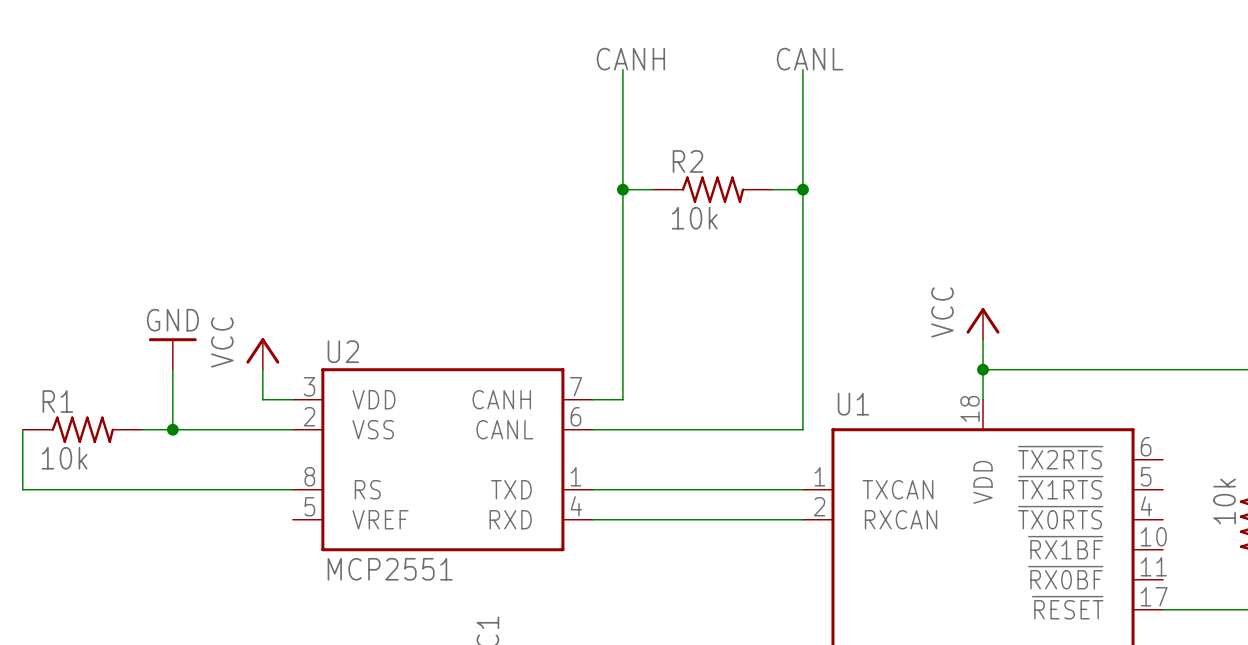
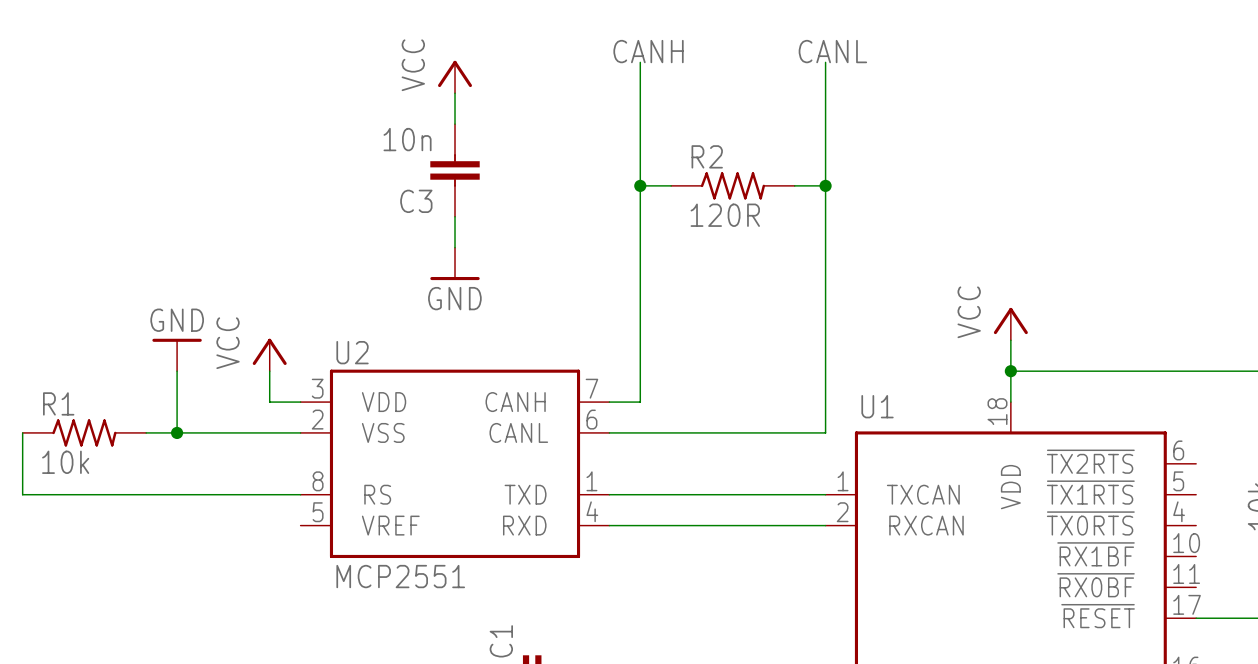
power symbol: none -> VCC (455, 77)
wire: none -> (455, 93) (455, 124)
C3: none -> 10n (455, 170)
R2 value: 10k (694, 218) -> 120R (725, 215)
wire: none -> (455, 216) (455, 247)
power symbol: none -> GND (455, 263)

